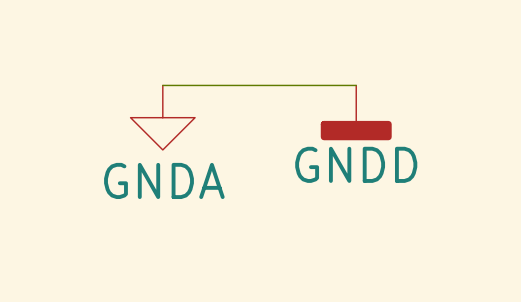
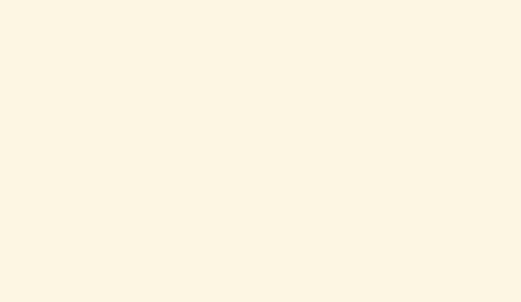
wire: (162, 85) (356, 85) -> none
power symbol: GNDD (356, 112) -> none
power symbol: GNDA (162, 117) -> none

